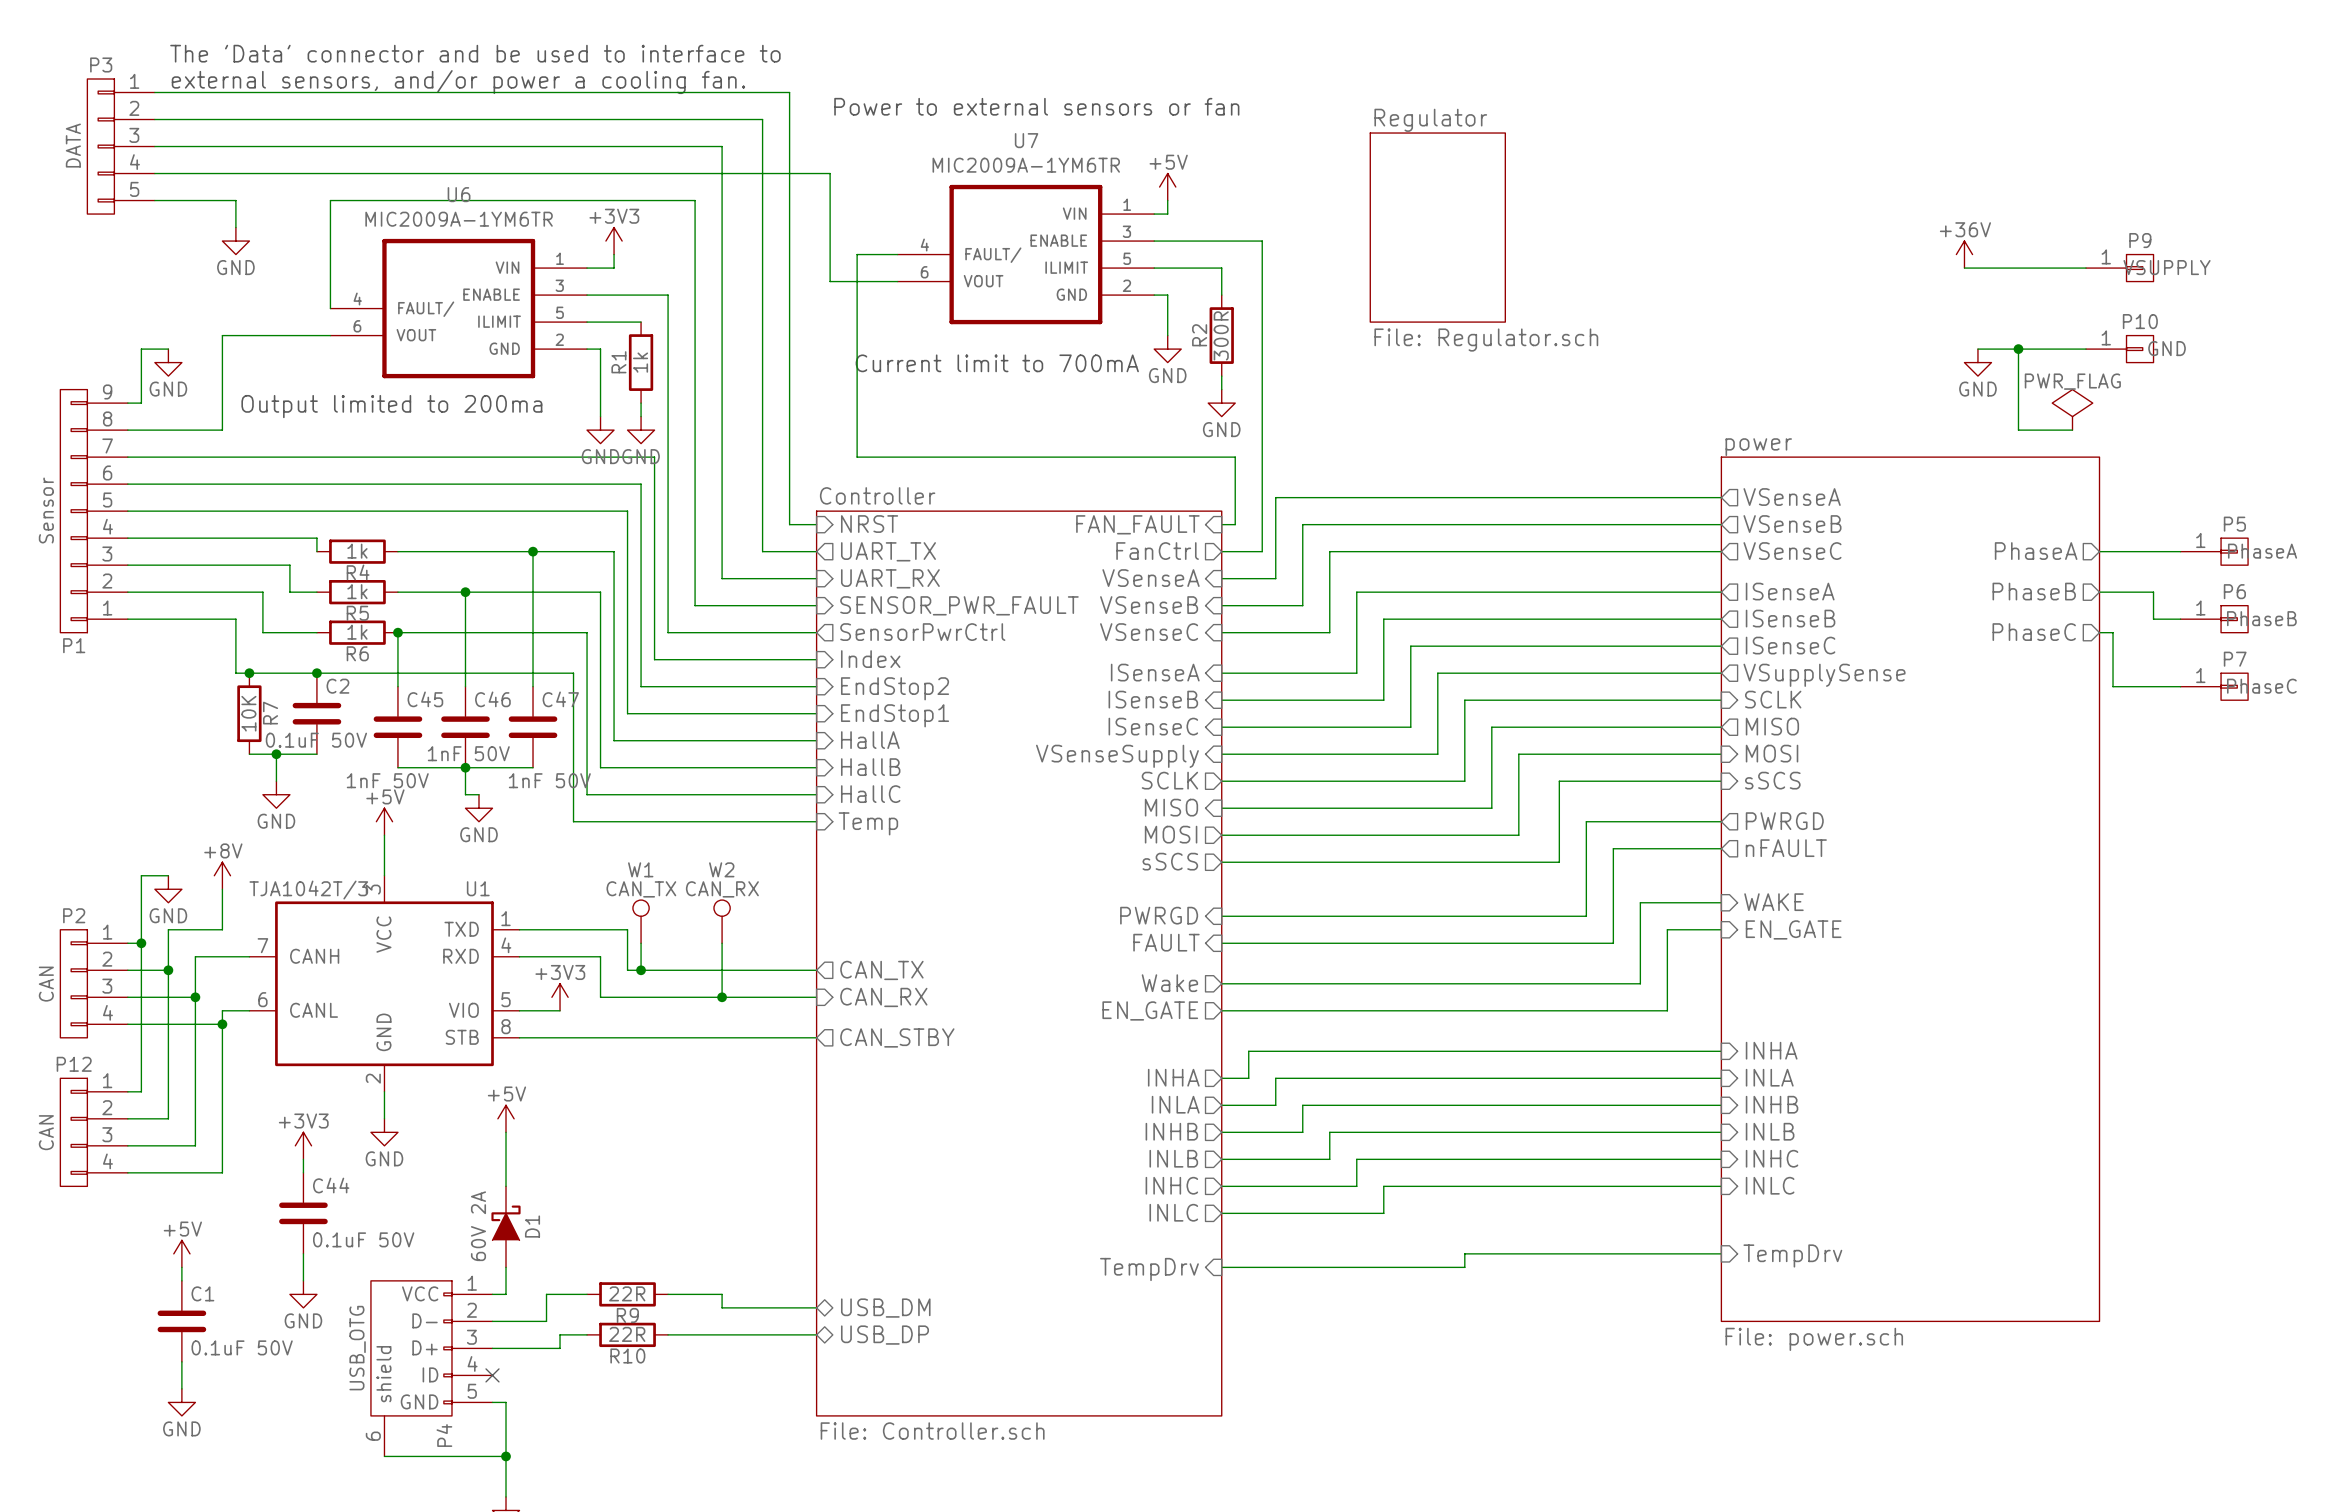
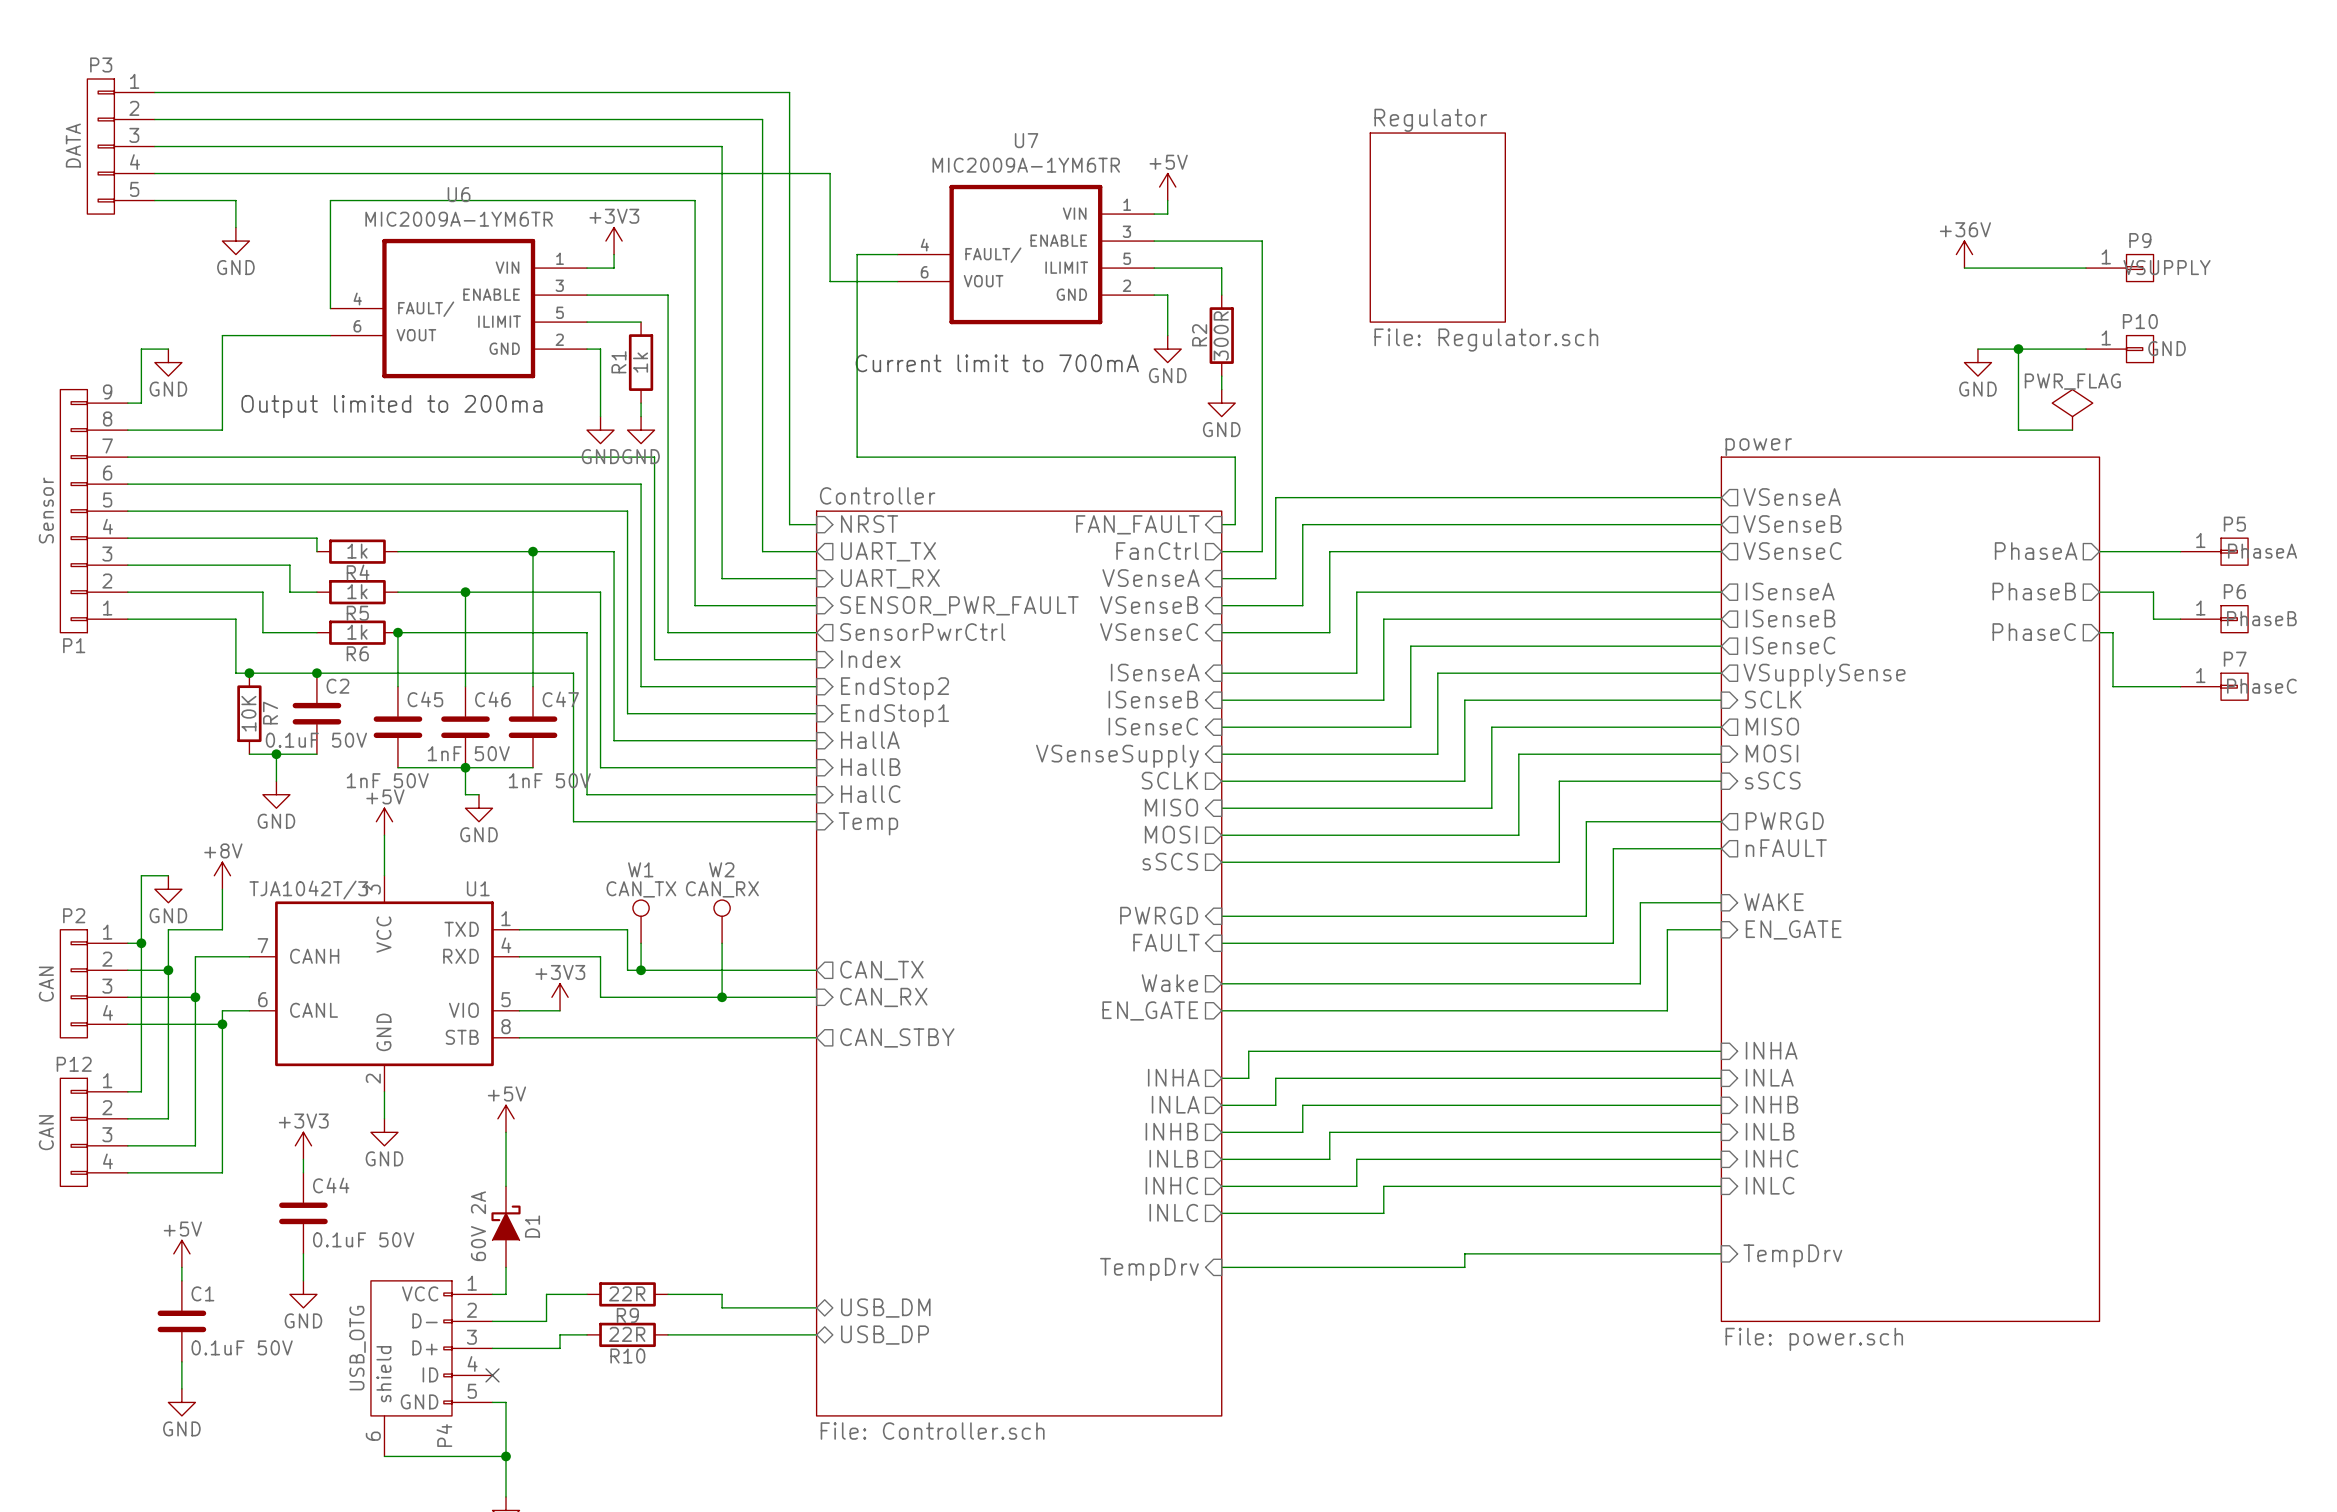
text: The 'Data' connector and be used to interface to (475, 53) -> none
text: external sensors, and/or power a cooling fan. (458, 82) -> none
text: Power to external sensors or fan (1036, 106) -> none

